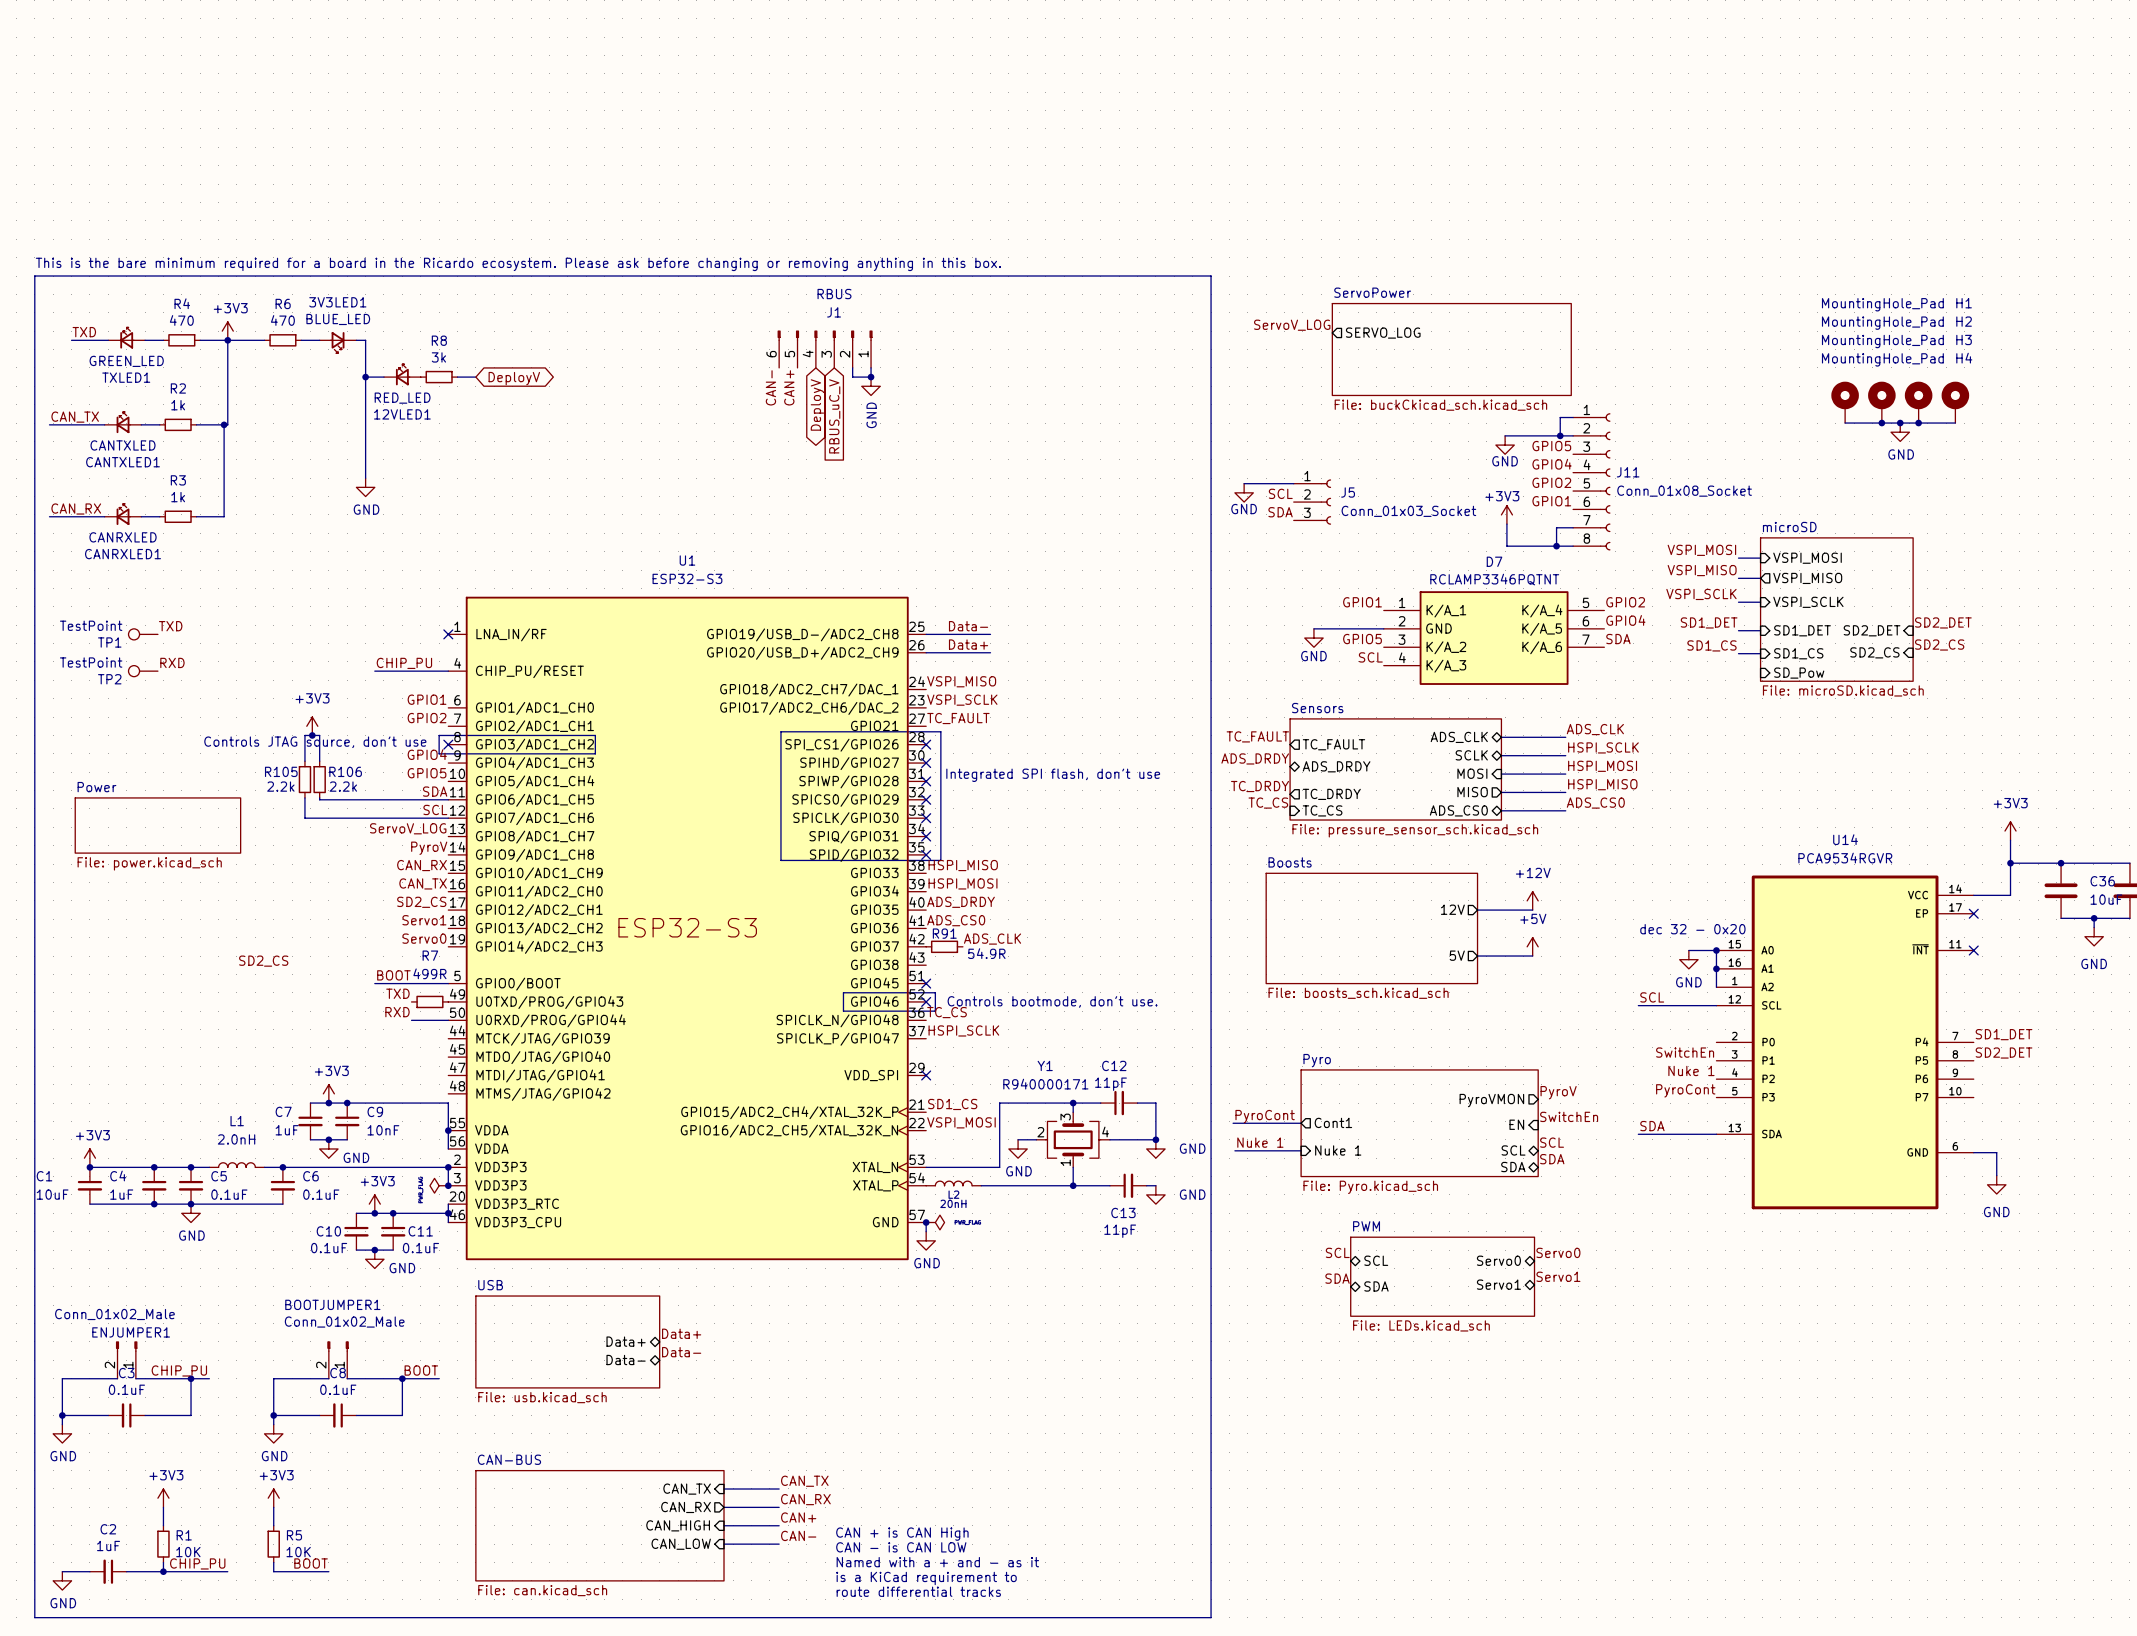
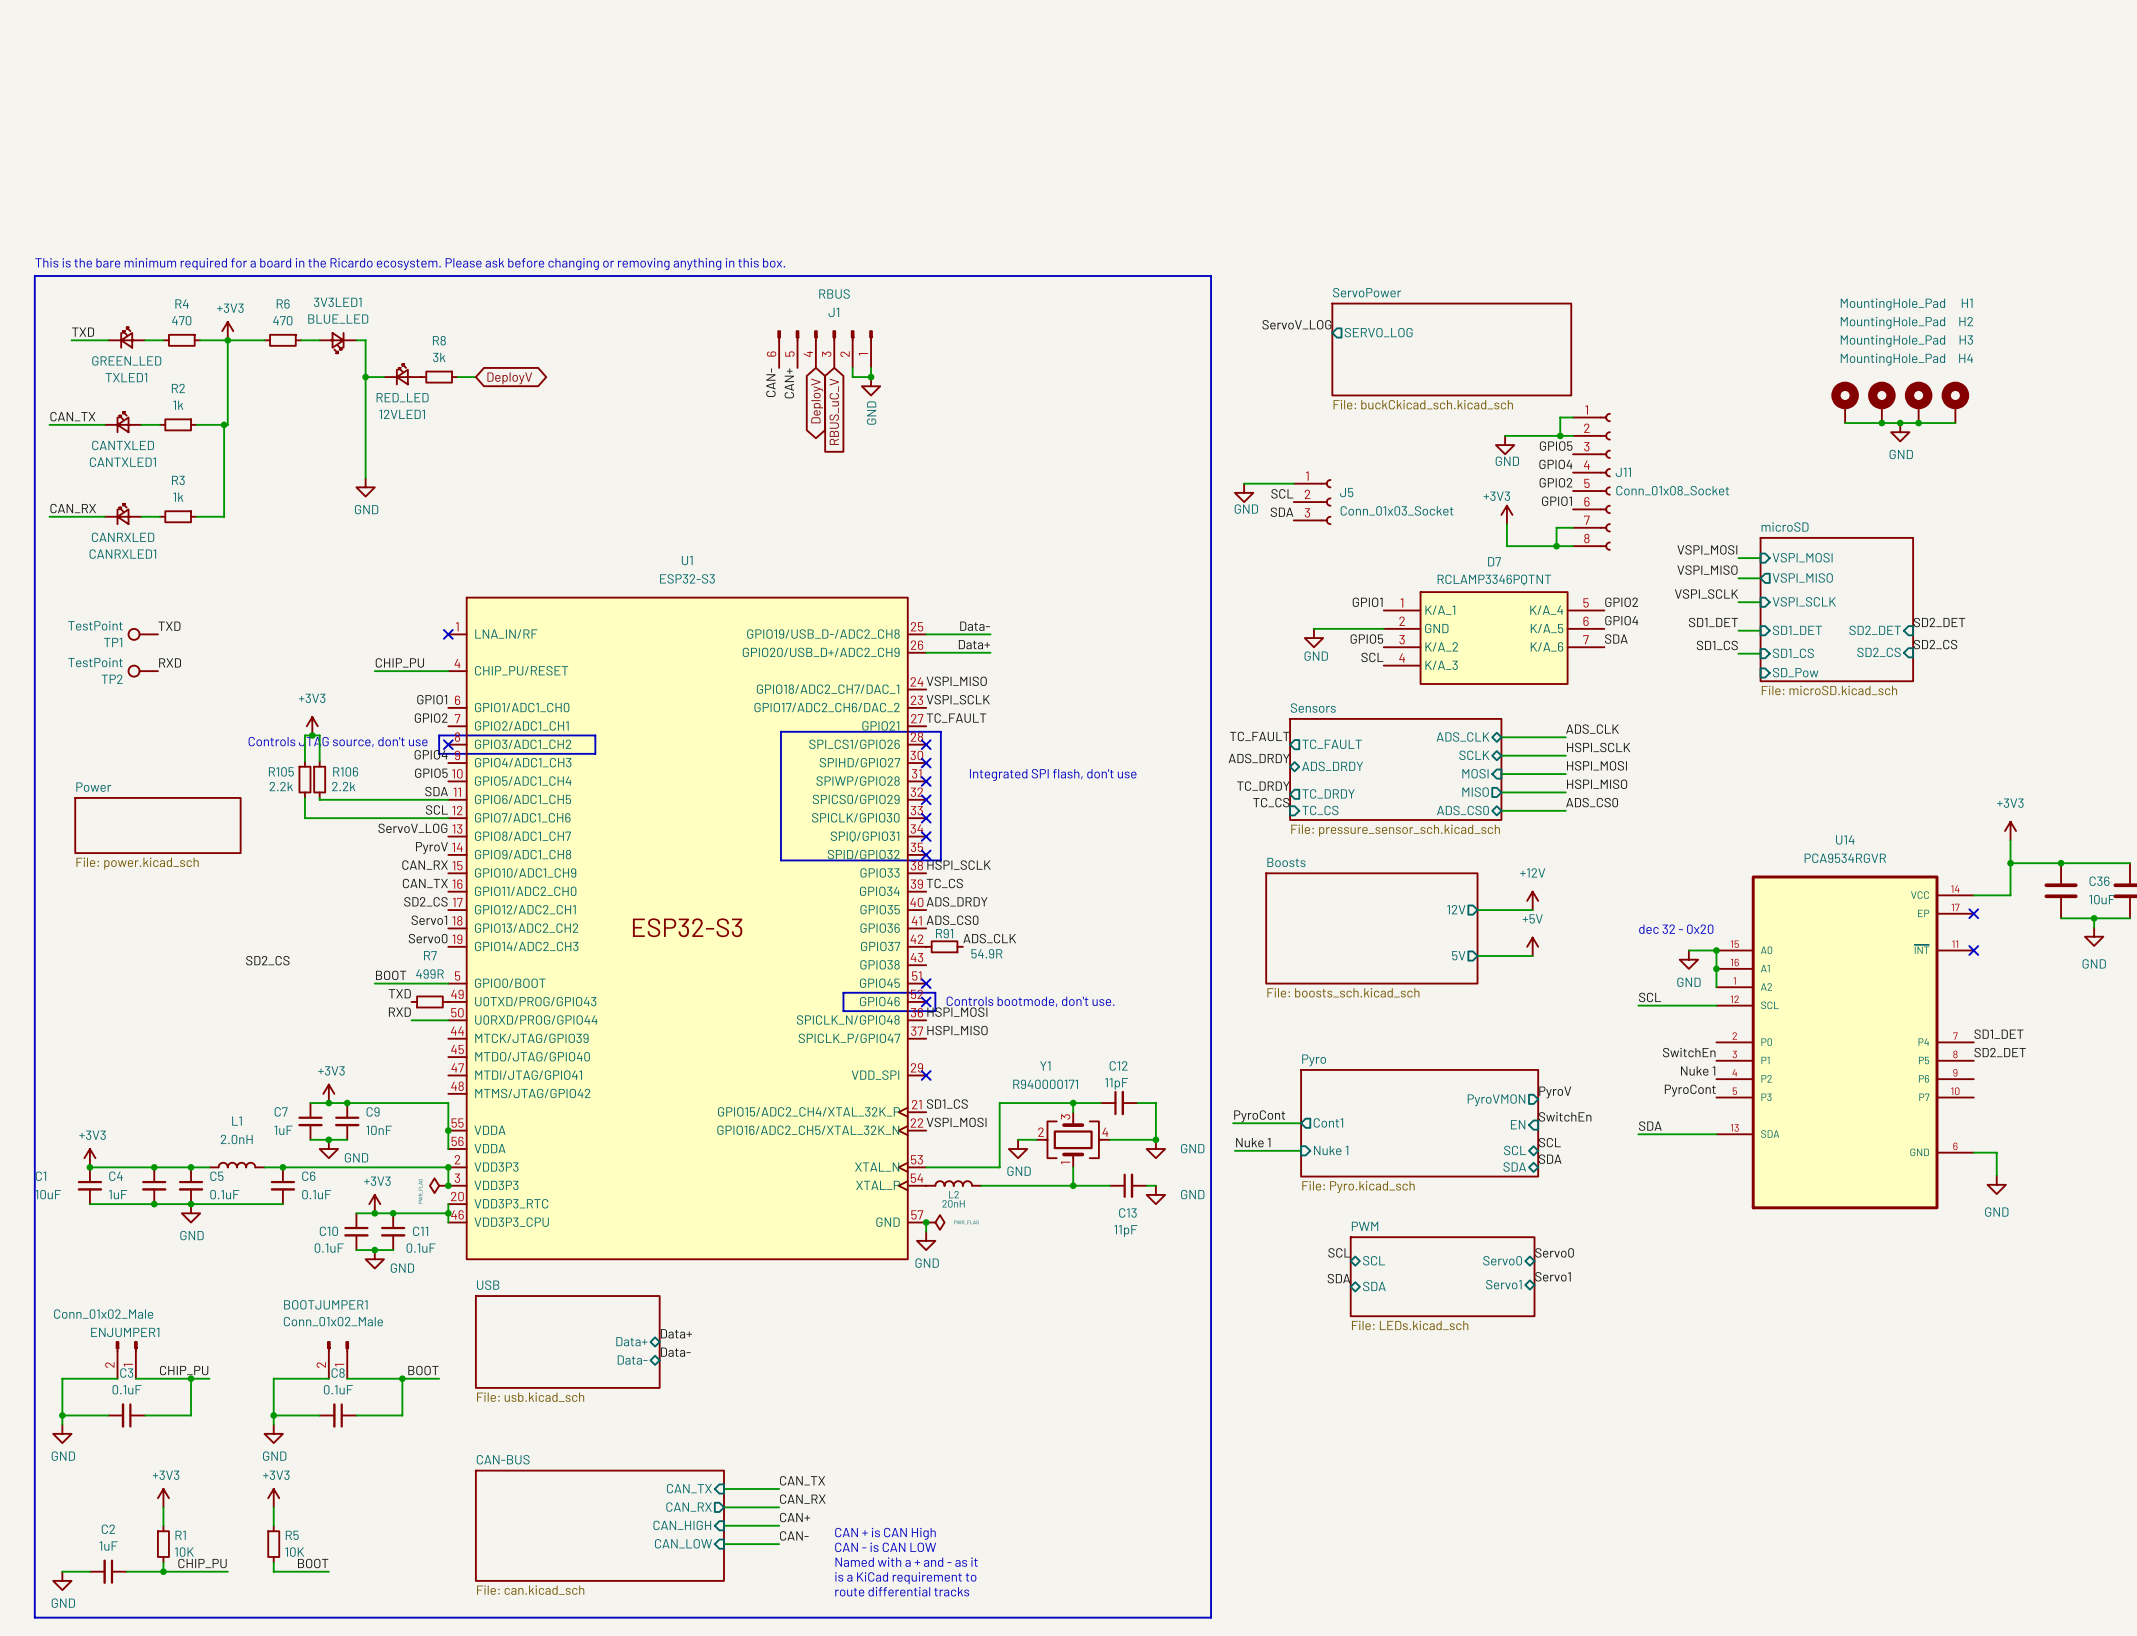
label: HSPI_MISO (963, 865) -> HSPI_SCLK (959, 865)
label: HSPI_MOSI (962, 883) -> TC_CS (944, 883)
label: TC_CS (947, 1012) -> HSPI_MOSI (957, 1012)
label: HSPI_SCLK (963, 1030) -> HSPI_MISO (957, 1030)

